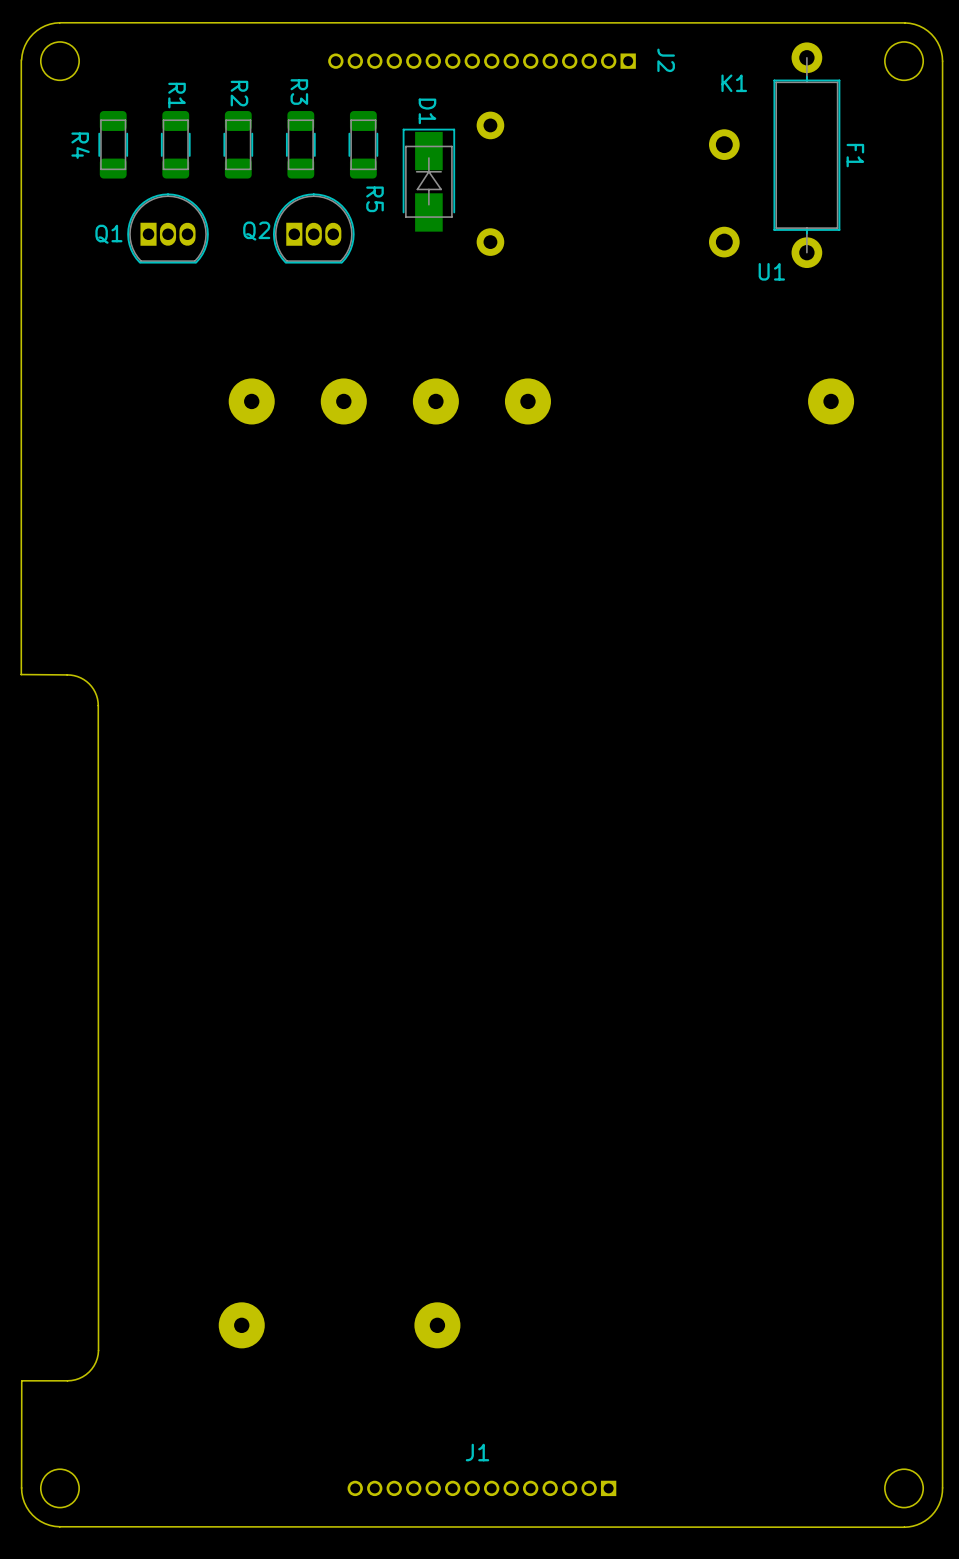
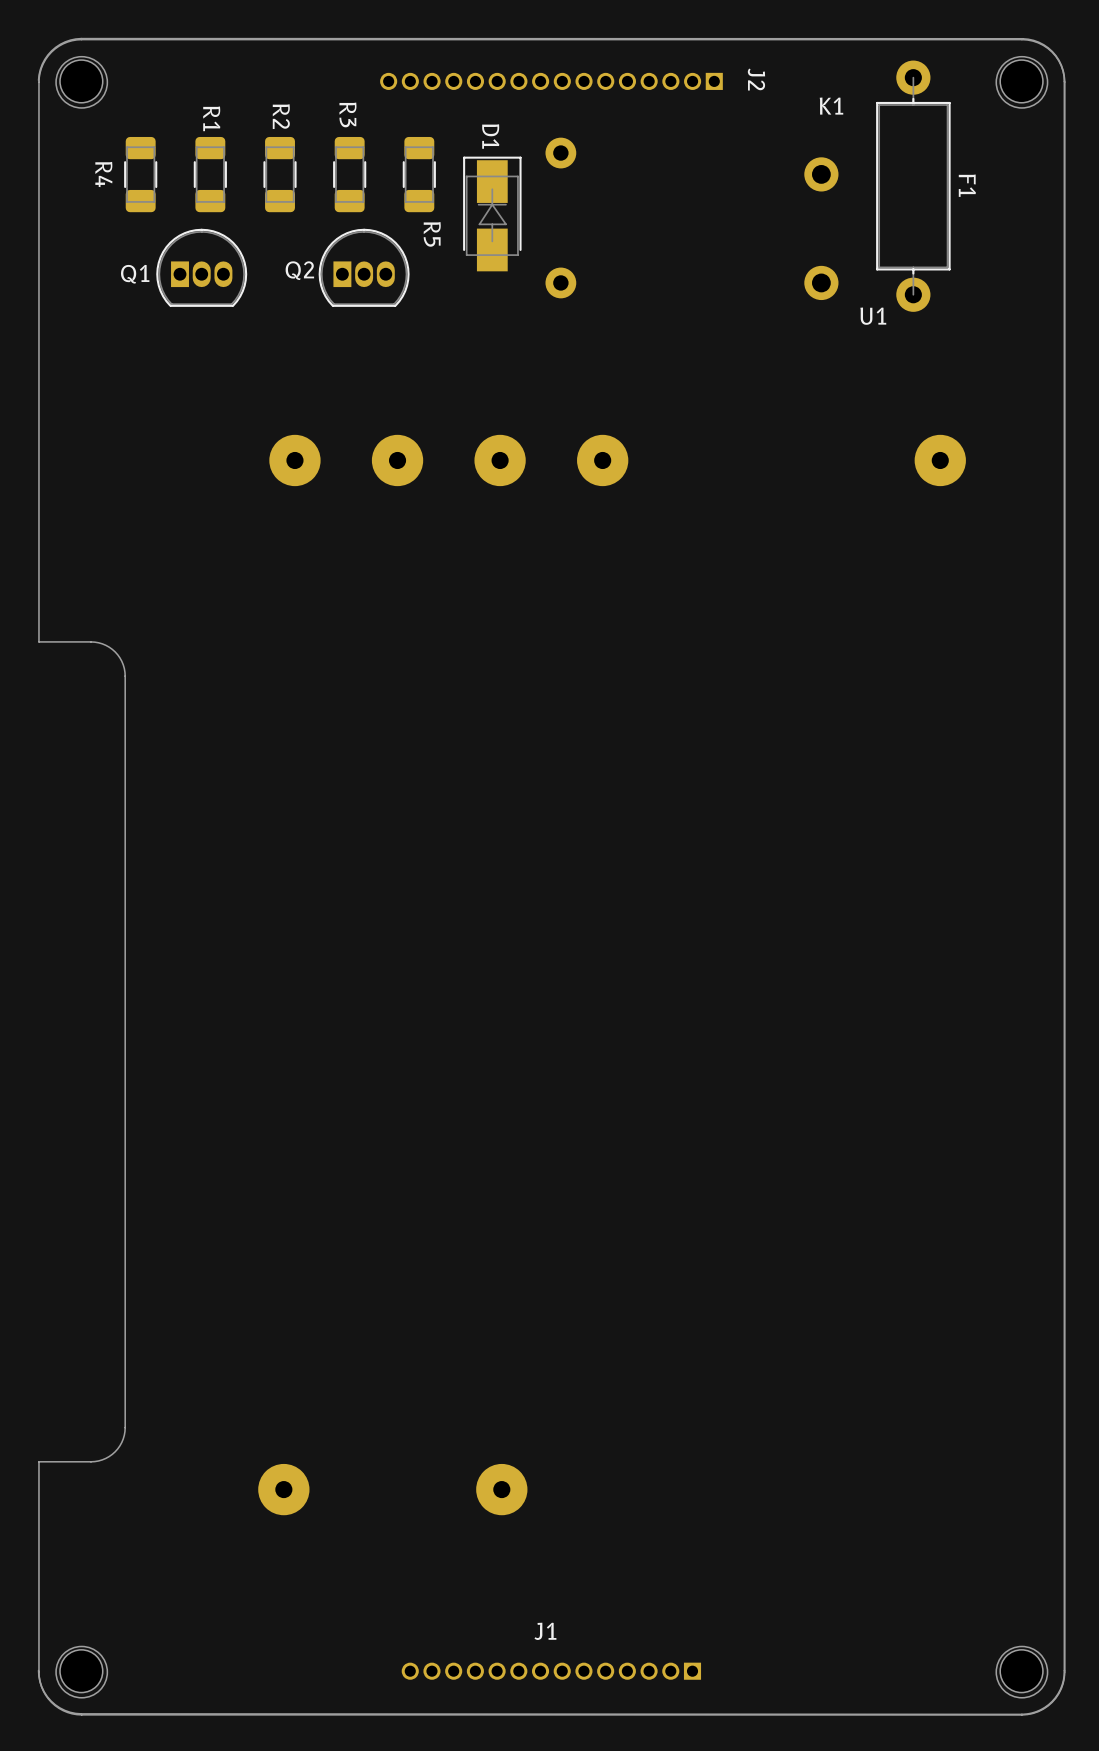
board edge: none -> (1021, 39) (81, 39) (67, 42) (58, 46) (45, 59) (41, 68) (38, 82) (38, 641) (91, 641) (102, 643) (112, 649) (119, 657) (125, 676) (124, 1431) (117, 1448) (102, 1459) (91, 1461) (38, 1461) (39, 1676) (45, 1694) (58, 1708) (72, 1713) (81, 1714) (1021, 1714) (1043, 1709) (1058, 1693) (1064, 1672) (1064, 82) (1061, 65) (1052, 52) (1038, 42) (1021, 39)
round board edge: none -> [56, 56, 108, 108]
round board edge: none -> [996, 56, 1048, 108]
board edge: (21, 60) (21, 674) -> none
board edge: (20, 674) (77, 676) (91, 686) (96, 695) (98, 705) (98, 1354) (91, 1369) (79, 1378) (67, 1380) (21, 1380) (21, 1488) -> none
round board edge: none -> [56, 1646, 108, 1698]
round board edge: none -> [996, 1646, 1048, 1698]

